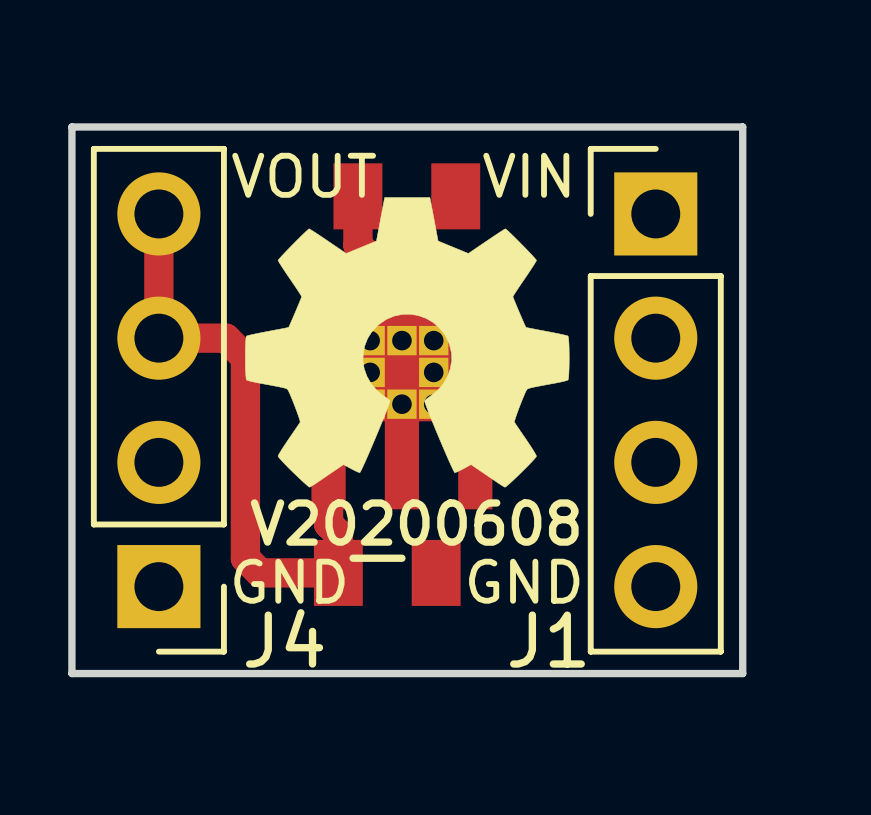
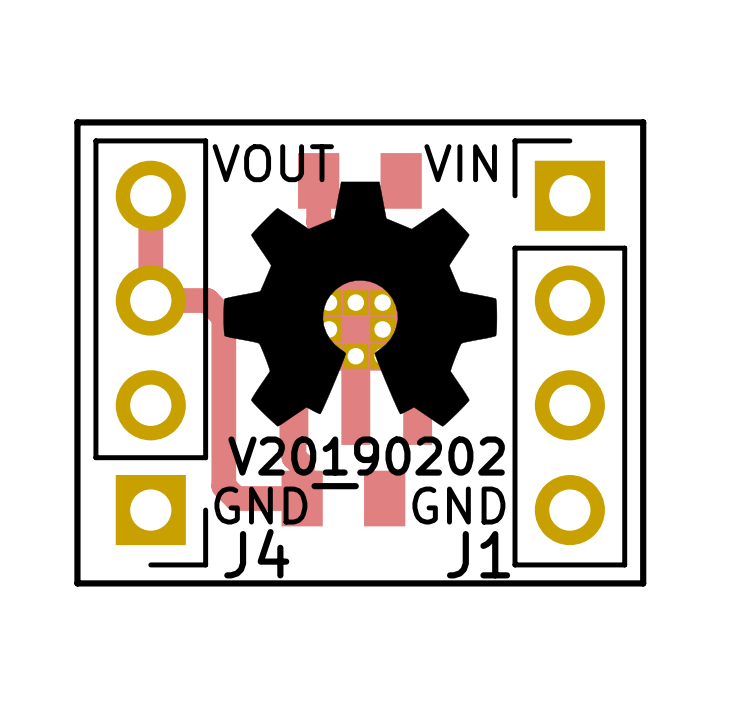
drawing shape: [250, 499, 579, 562] -> [228, 436, 505, 490]

